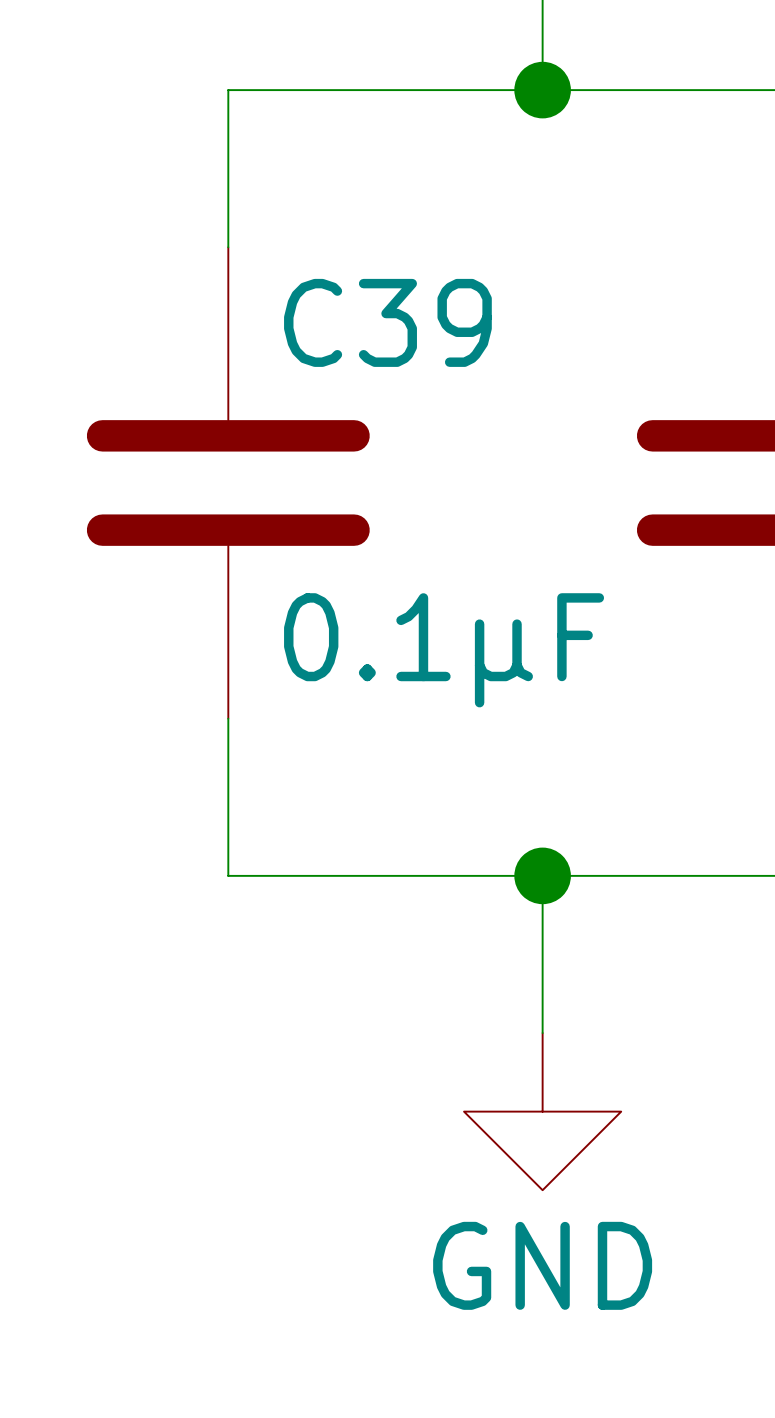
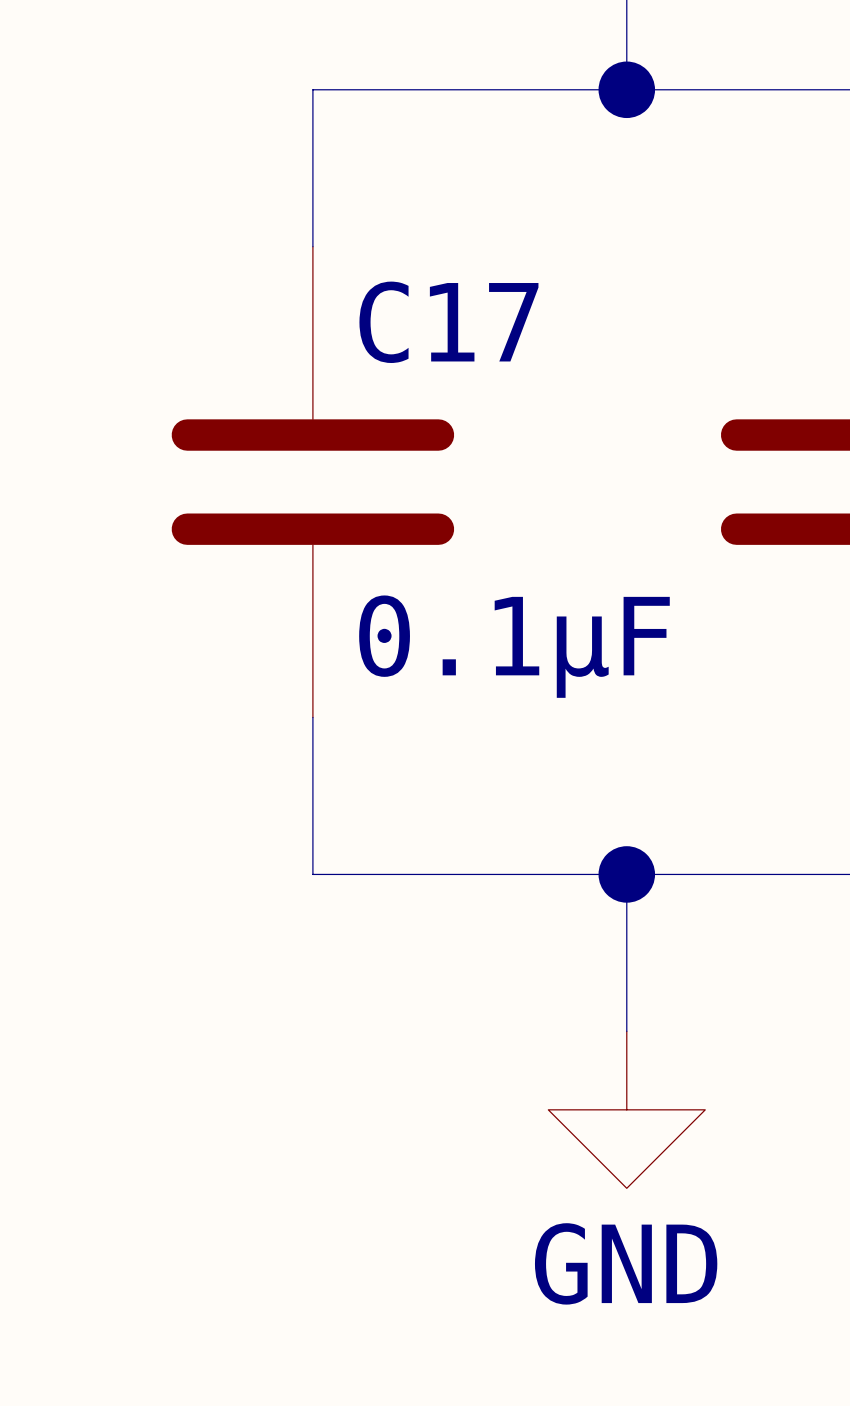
C39 name: C39 (387, 322) -> C17 (448, 322)

